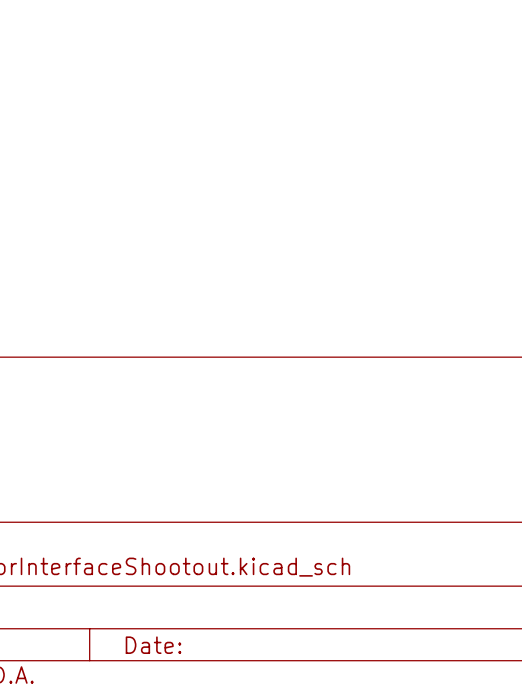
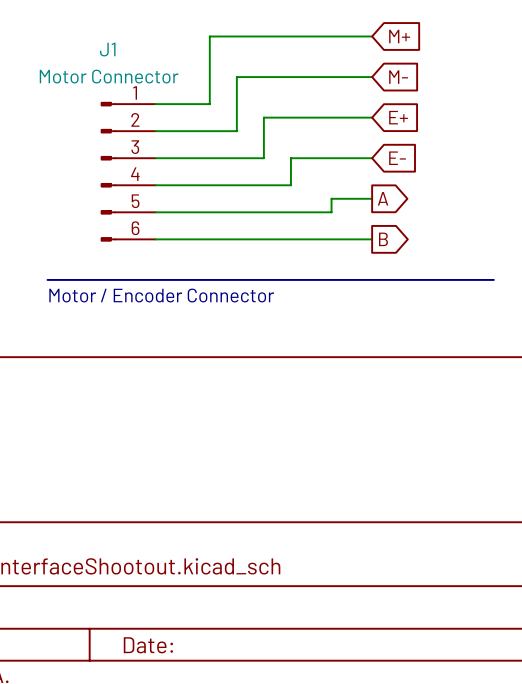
wire: none -> (372, 36) (209, 36) (209, 104) (155, 104)
global label: none -> M+ (399, 36)
wire: none -> (372, 77) (236, 77) (236, 131) (155, 131)
global label: none -> M- (398, 77)
wire: none -> (372, 117) (263, 117) (263, 158) (155, 158)
global label: none -> E+ (398, 117)
wire: none -> (372, 158) (290, 158) (290, 185) (155, 185)
global label: none -> E- (397, 158)
J1: none -> Motor Connector (128, 171)
wire: none -> (372, 198) (331, 198) (331, 212) (155, 212)
global label: none -> A (383, 198)
wire: none -> (155, 239) (372, 239)
global label: none -> B (383, 239)
line: none -> (47, 279) (493, 279)
text: none -> Motor / Encoder Connector (161, 295)

